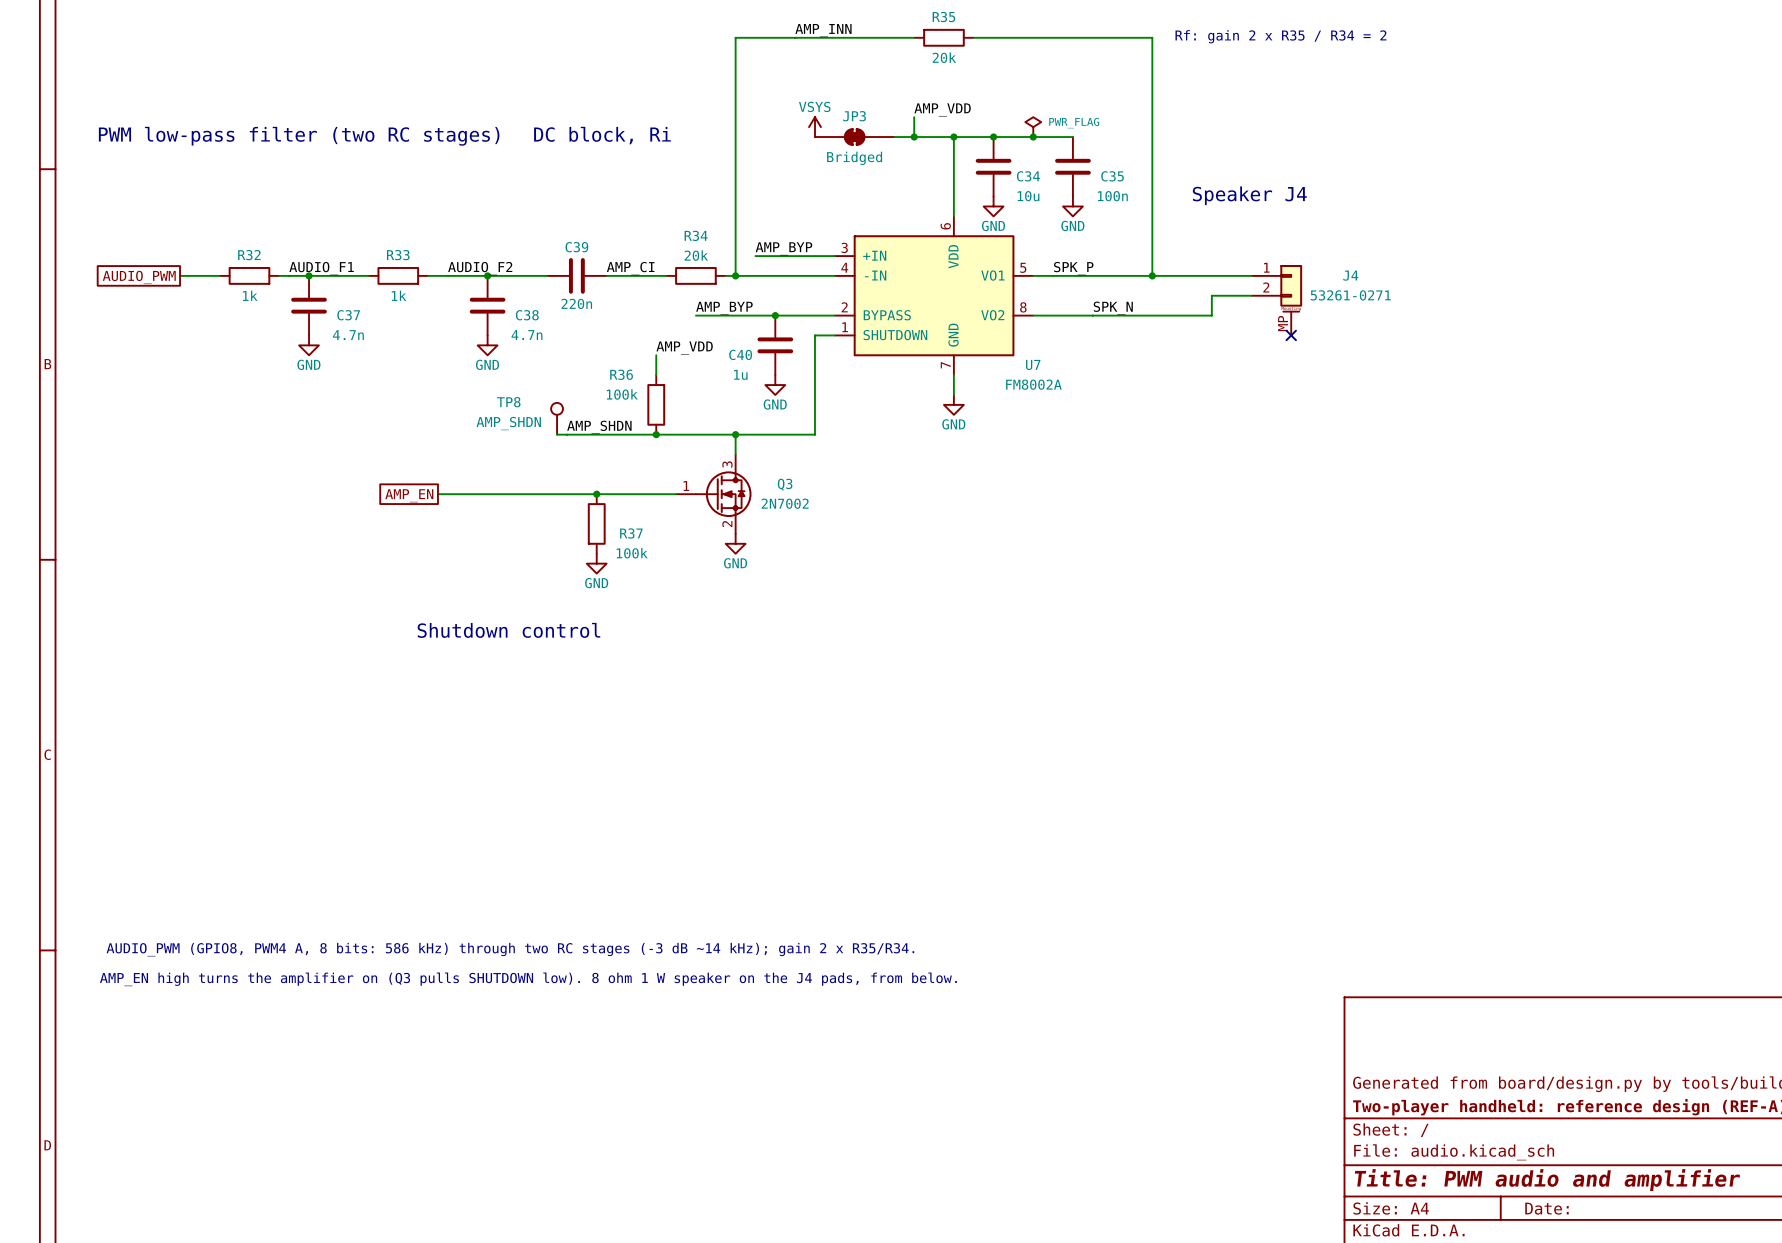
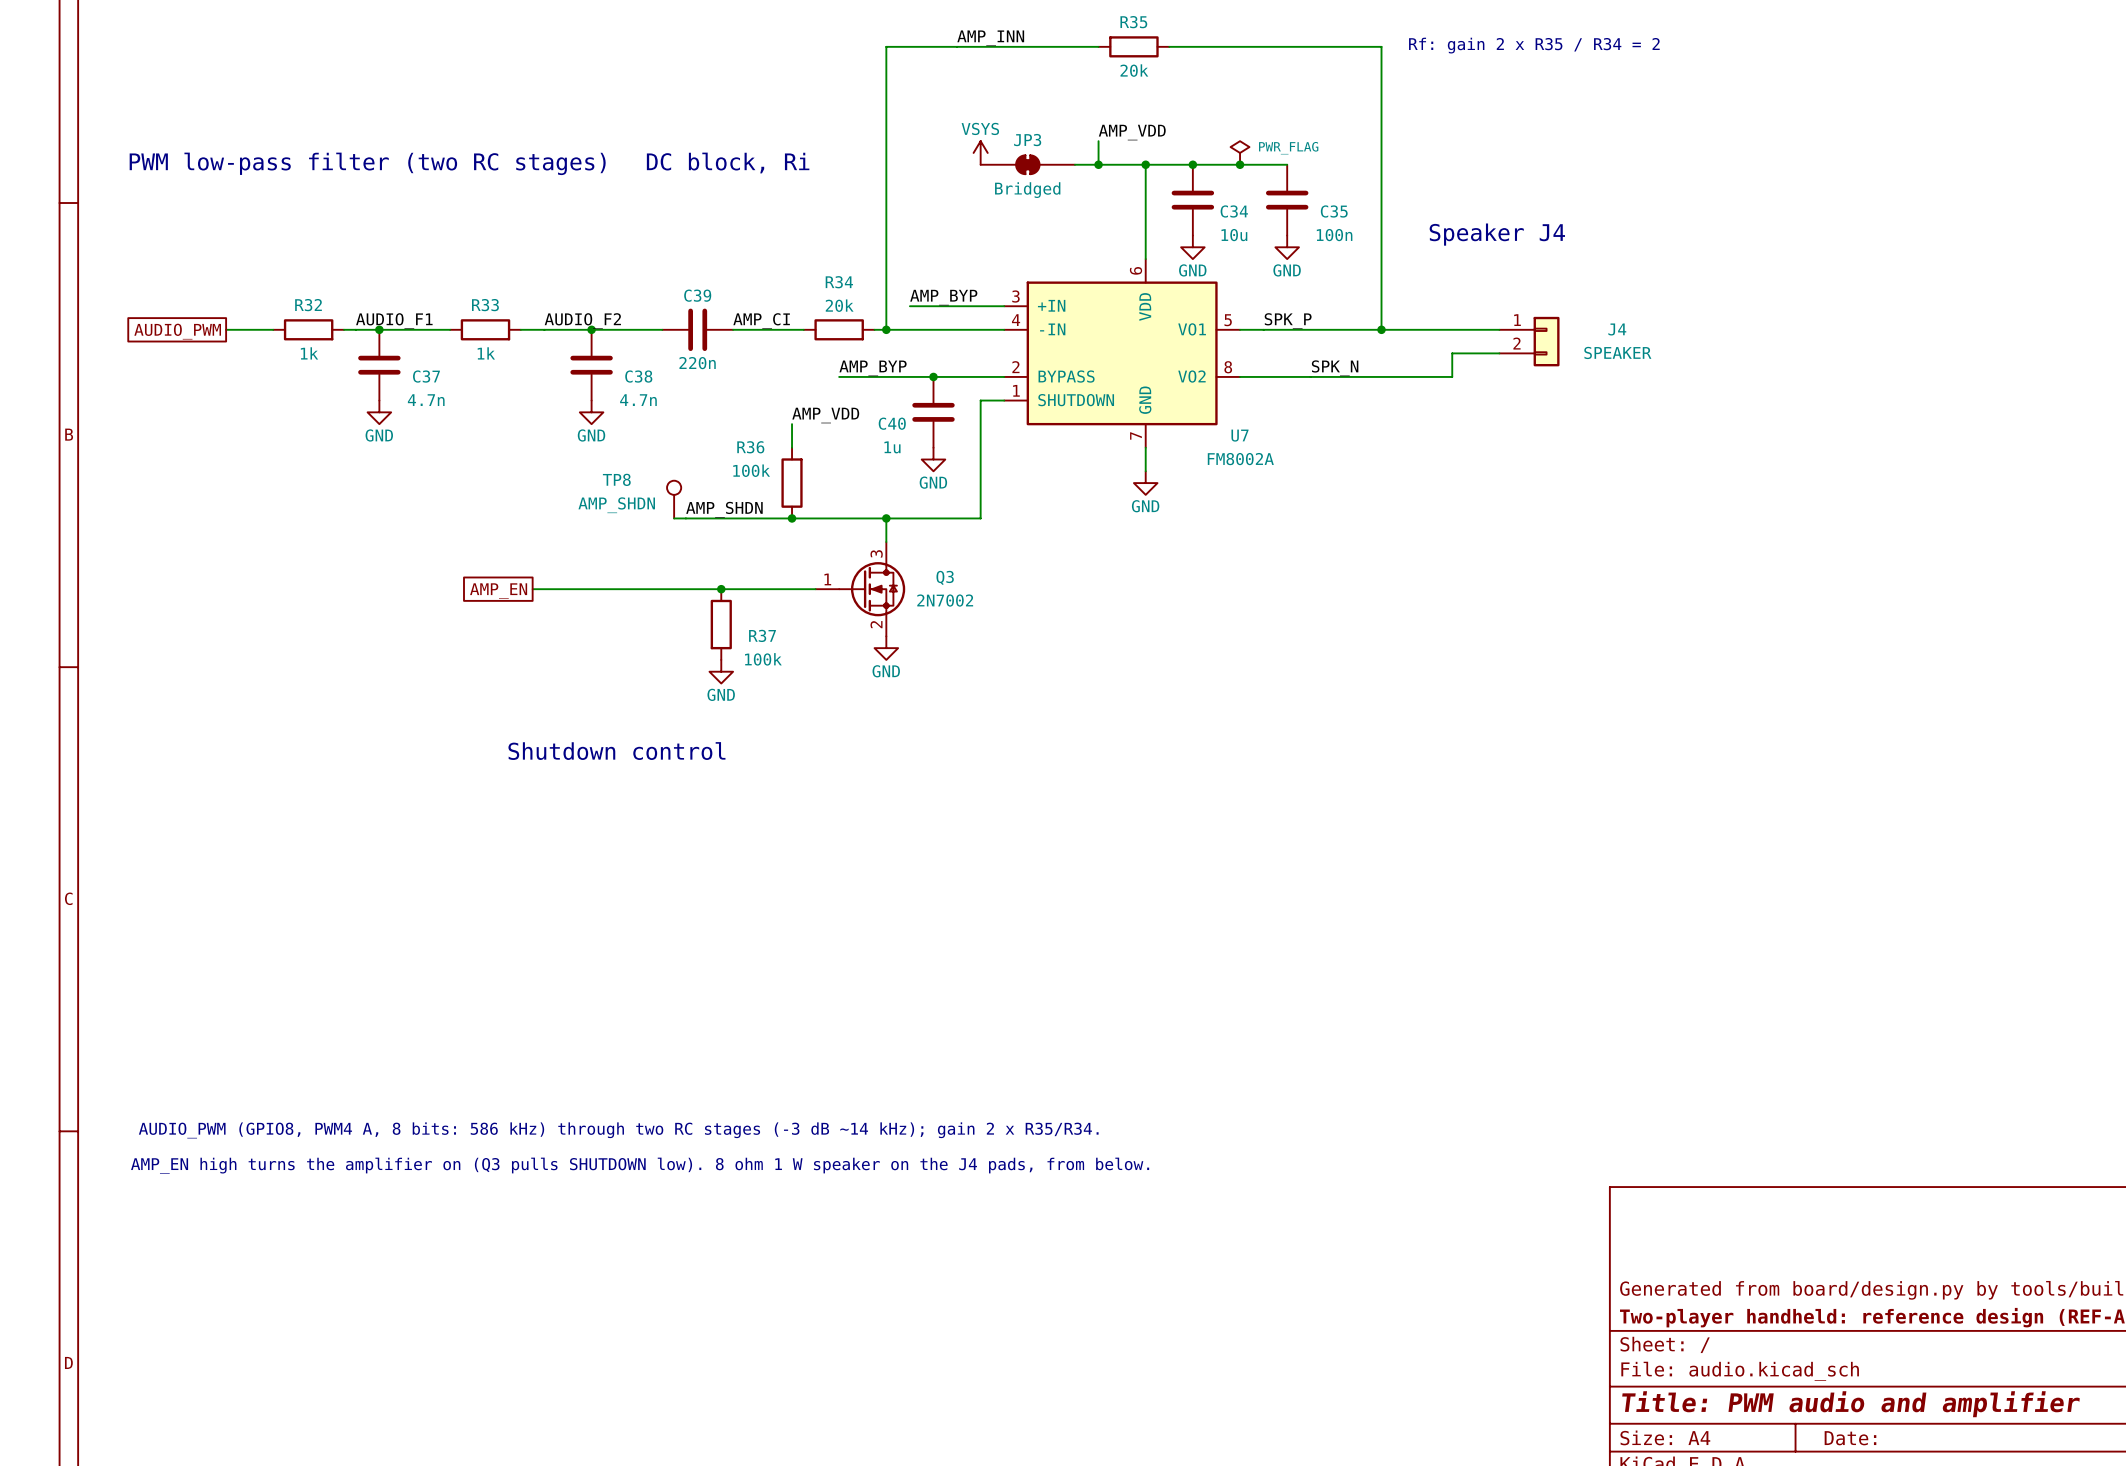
J4 symbol: [1251, 265, 1303, 336] -> [1499, 316, 1560, 367]
J4 value: 53261-0271 (1350, 295) -> SPEAKER (1617, 352)
no-connect mark: (1291, 335) -> none

